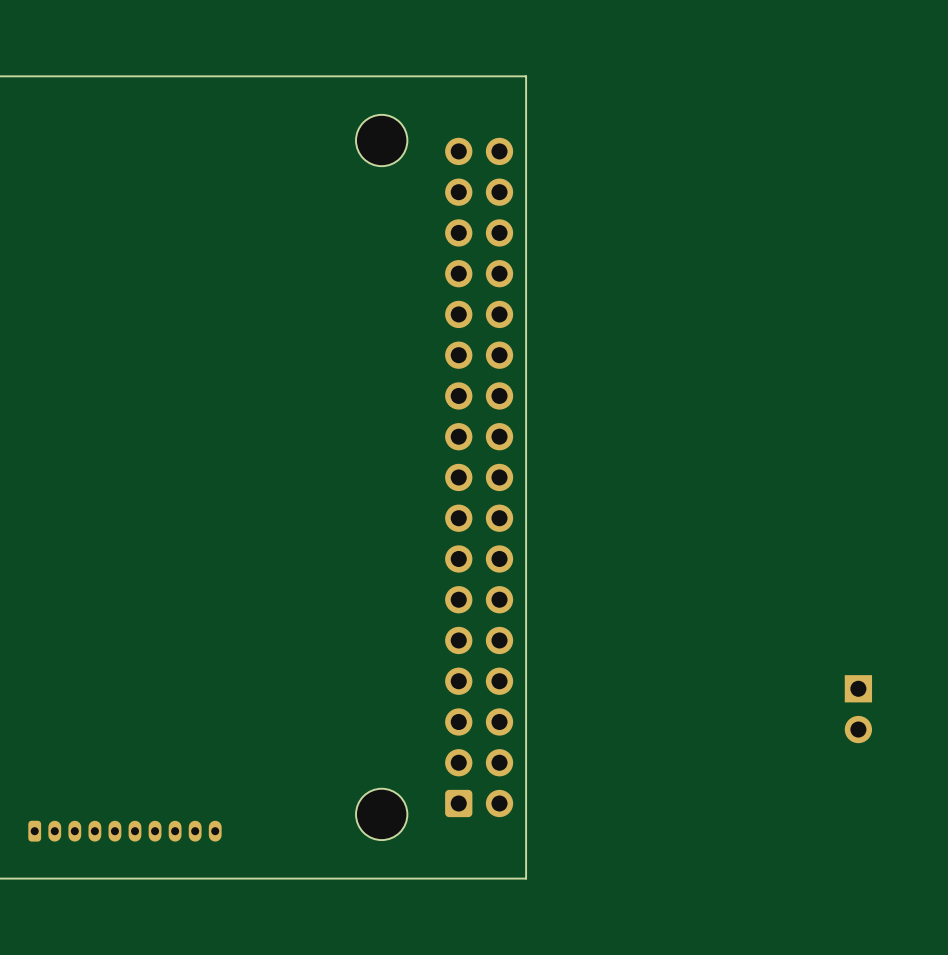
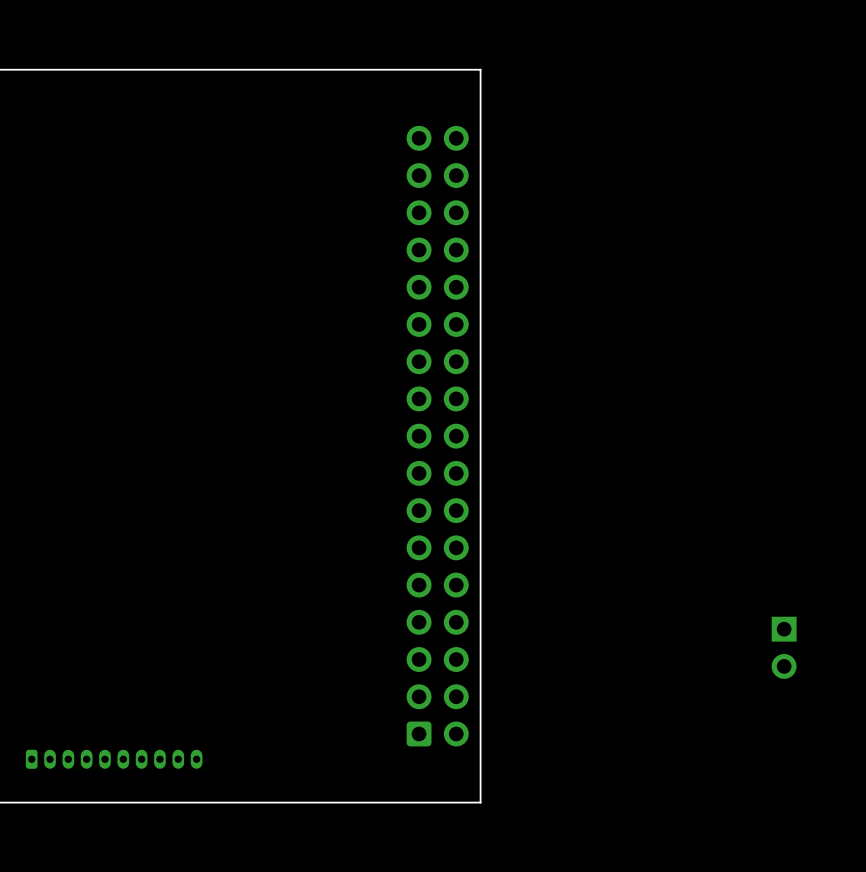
part: (381, 140) -> none
part: (381, 814) -> none

